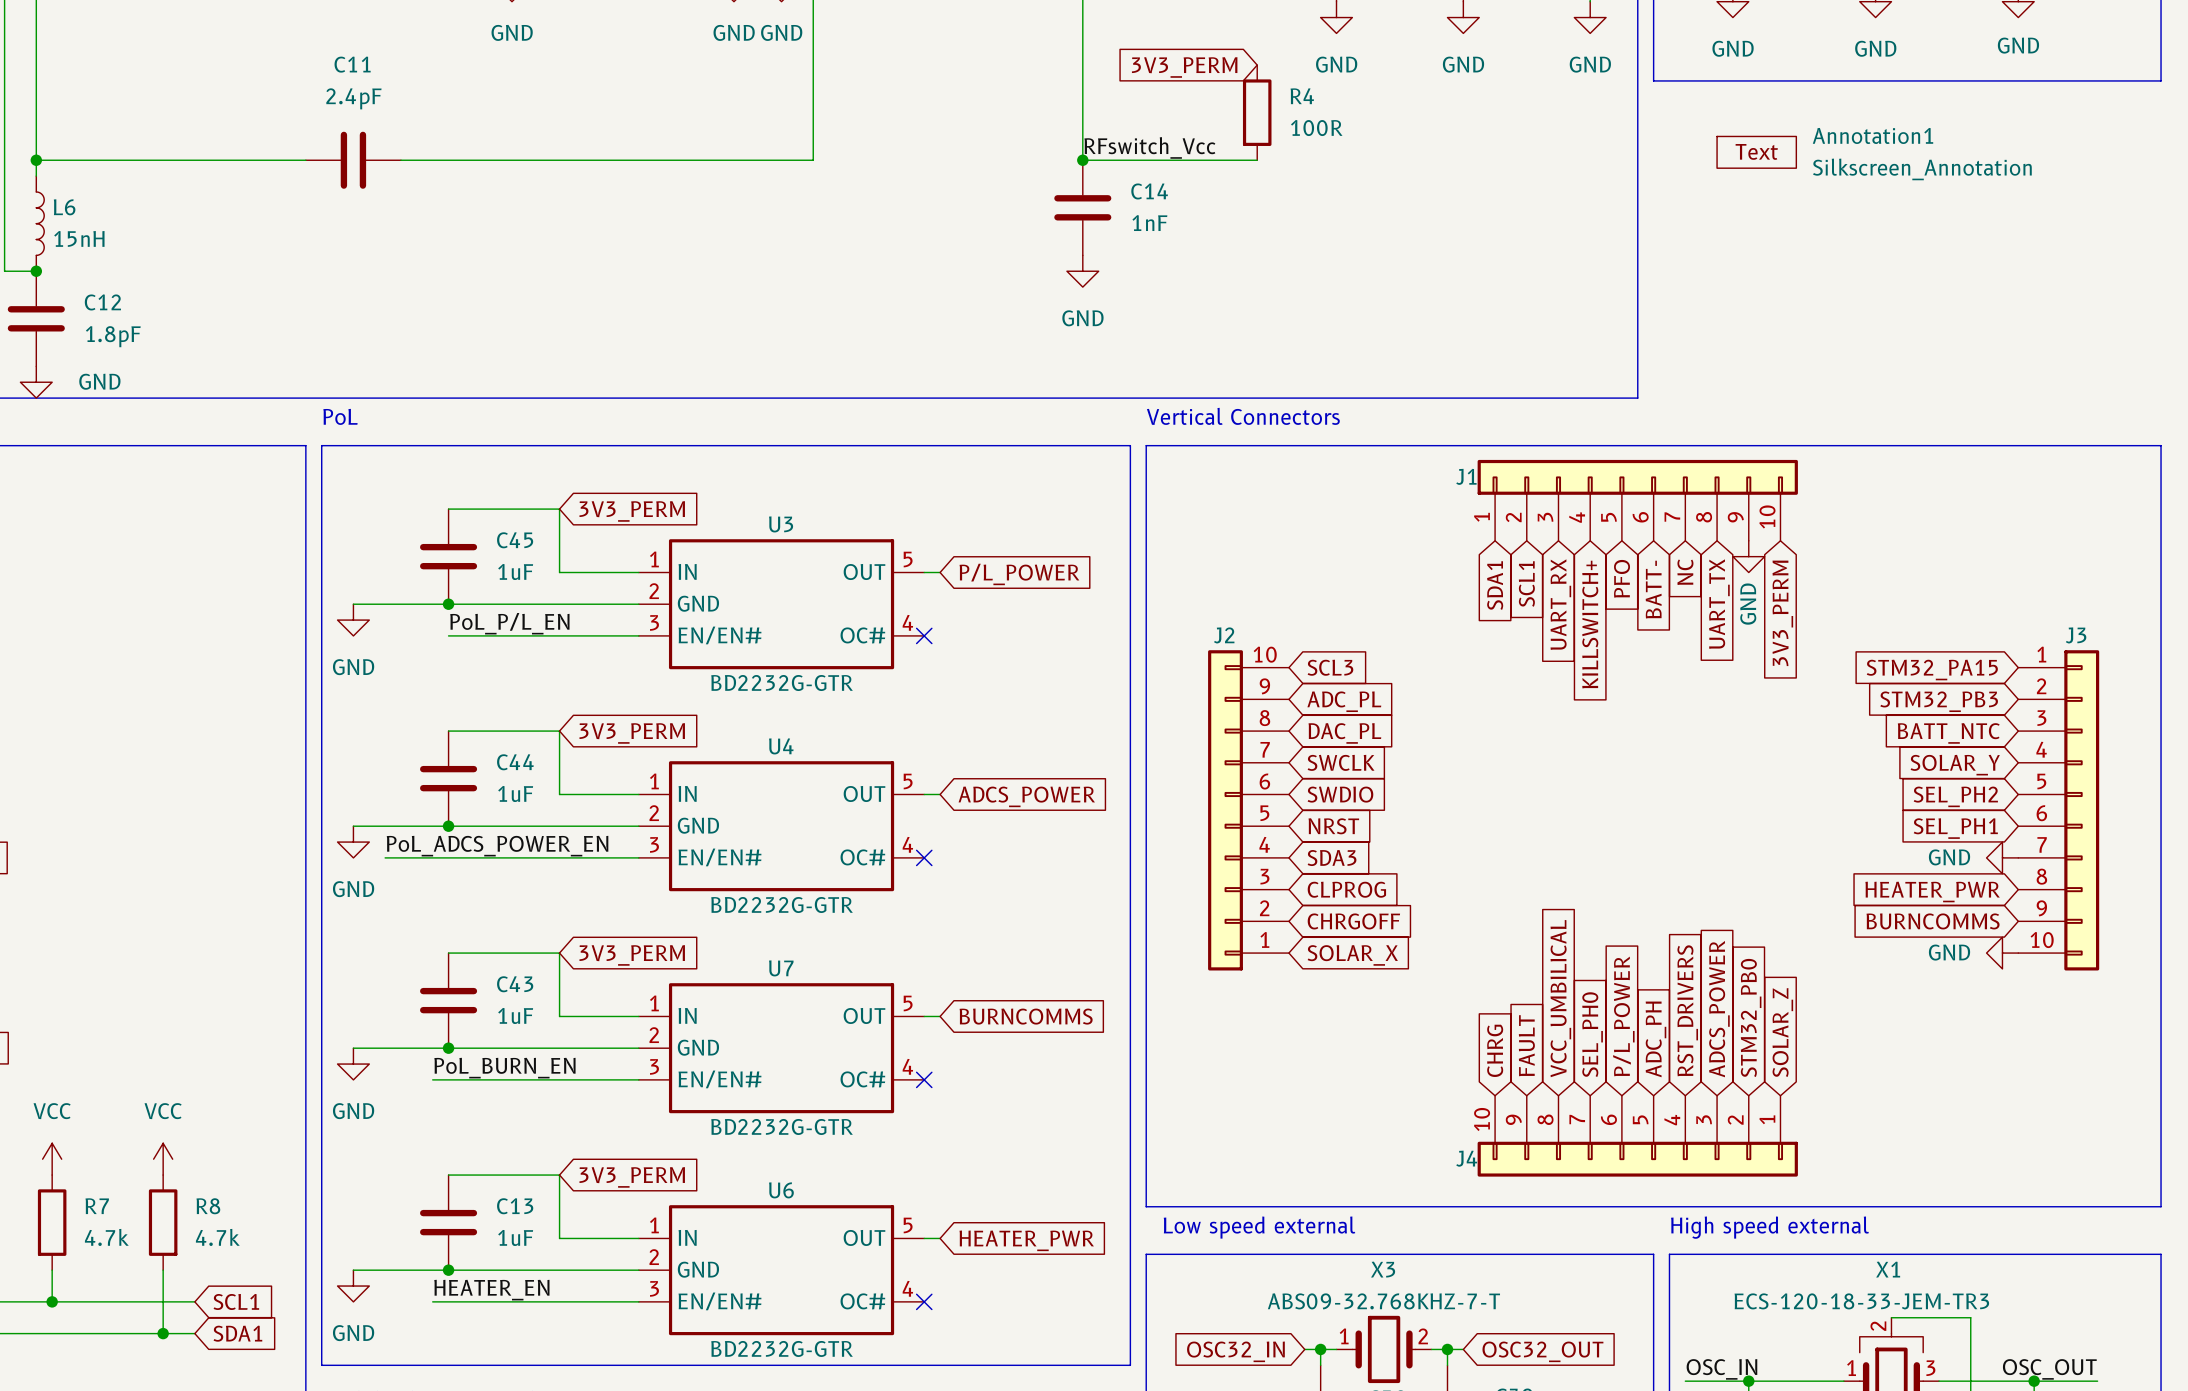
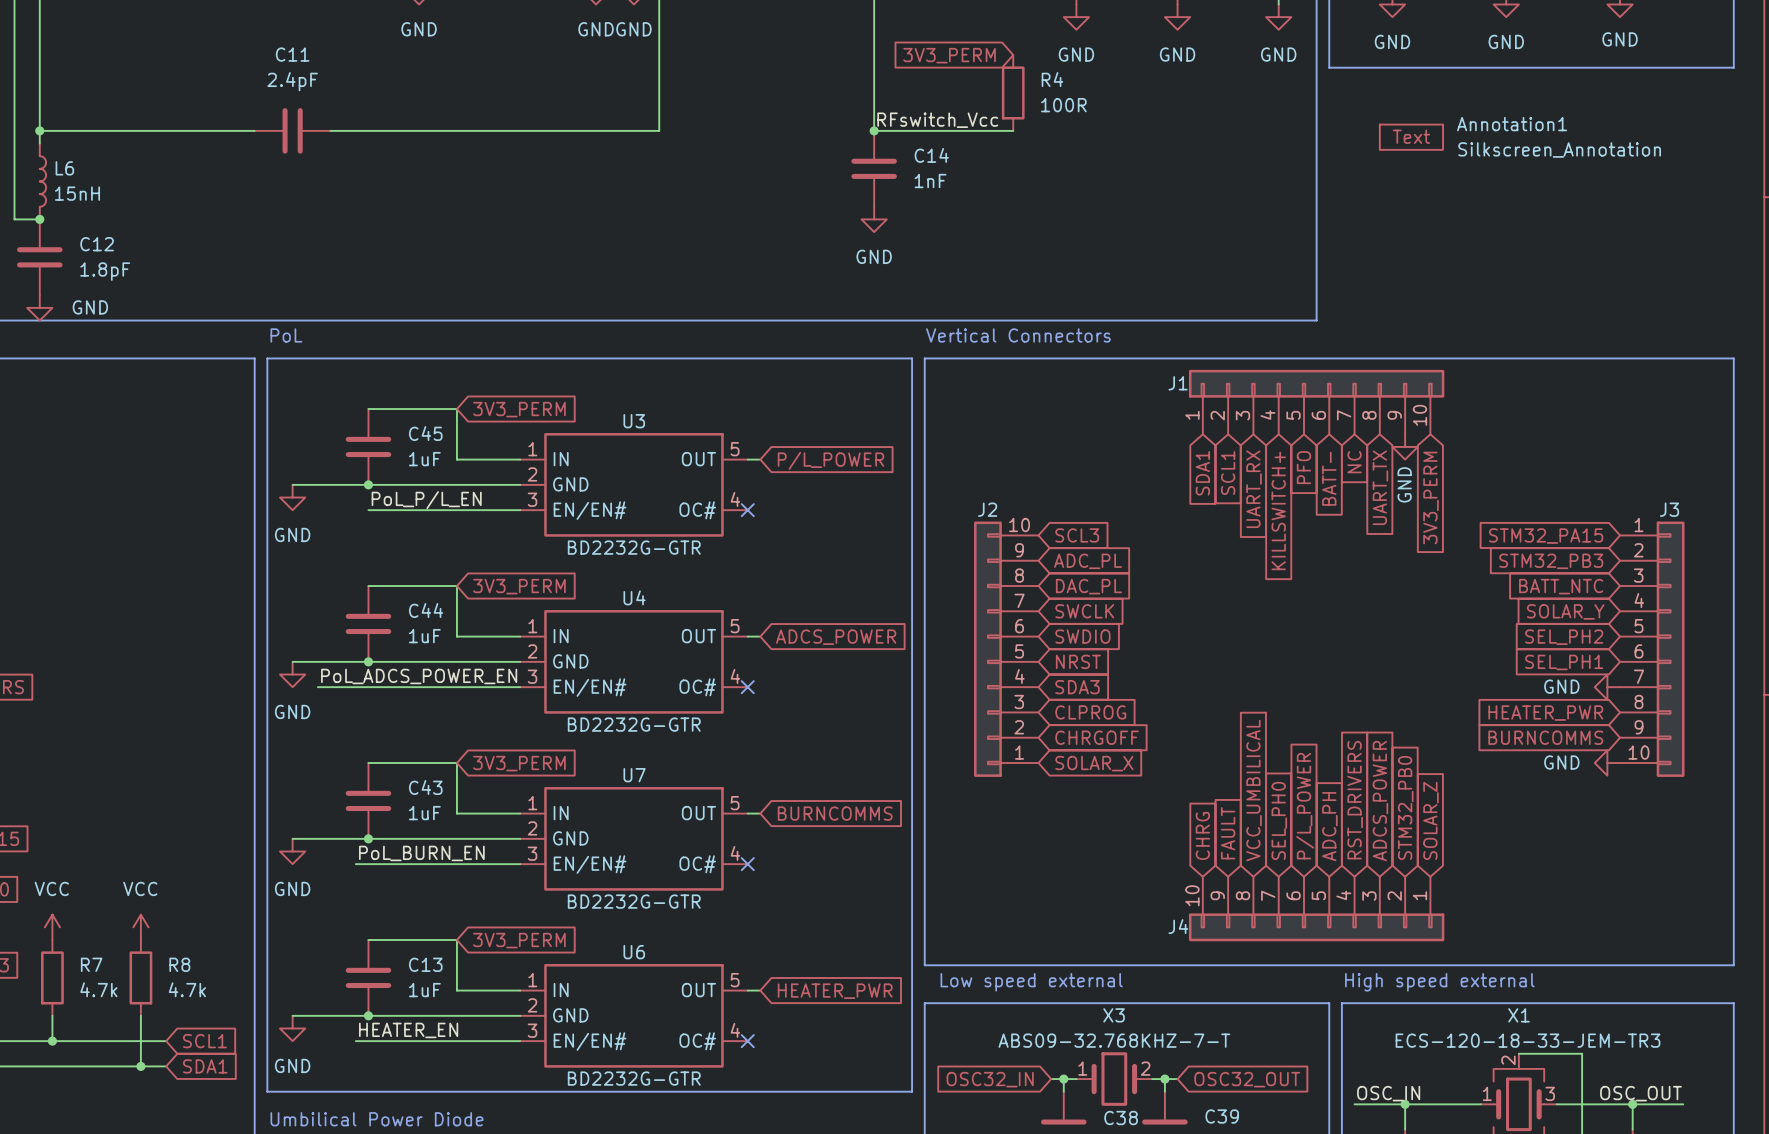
Annotation1 position: (1756, 152) -> (1411, 137)

